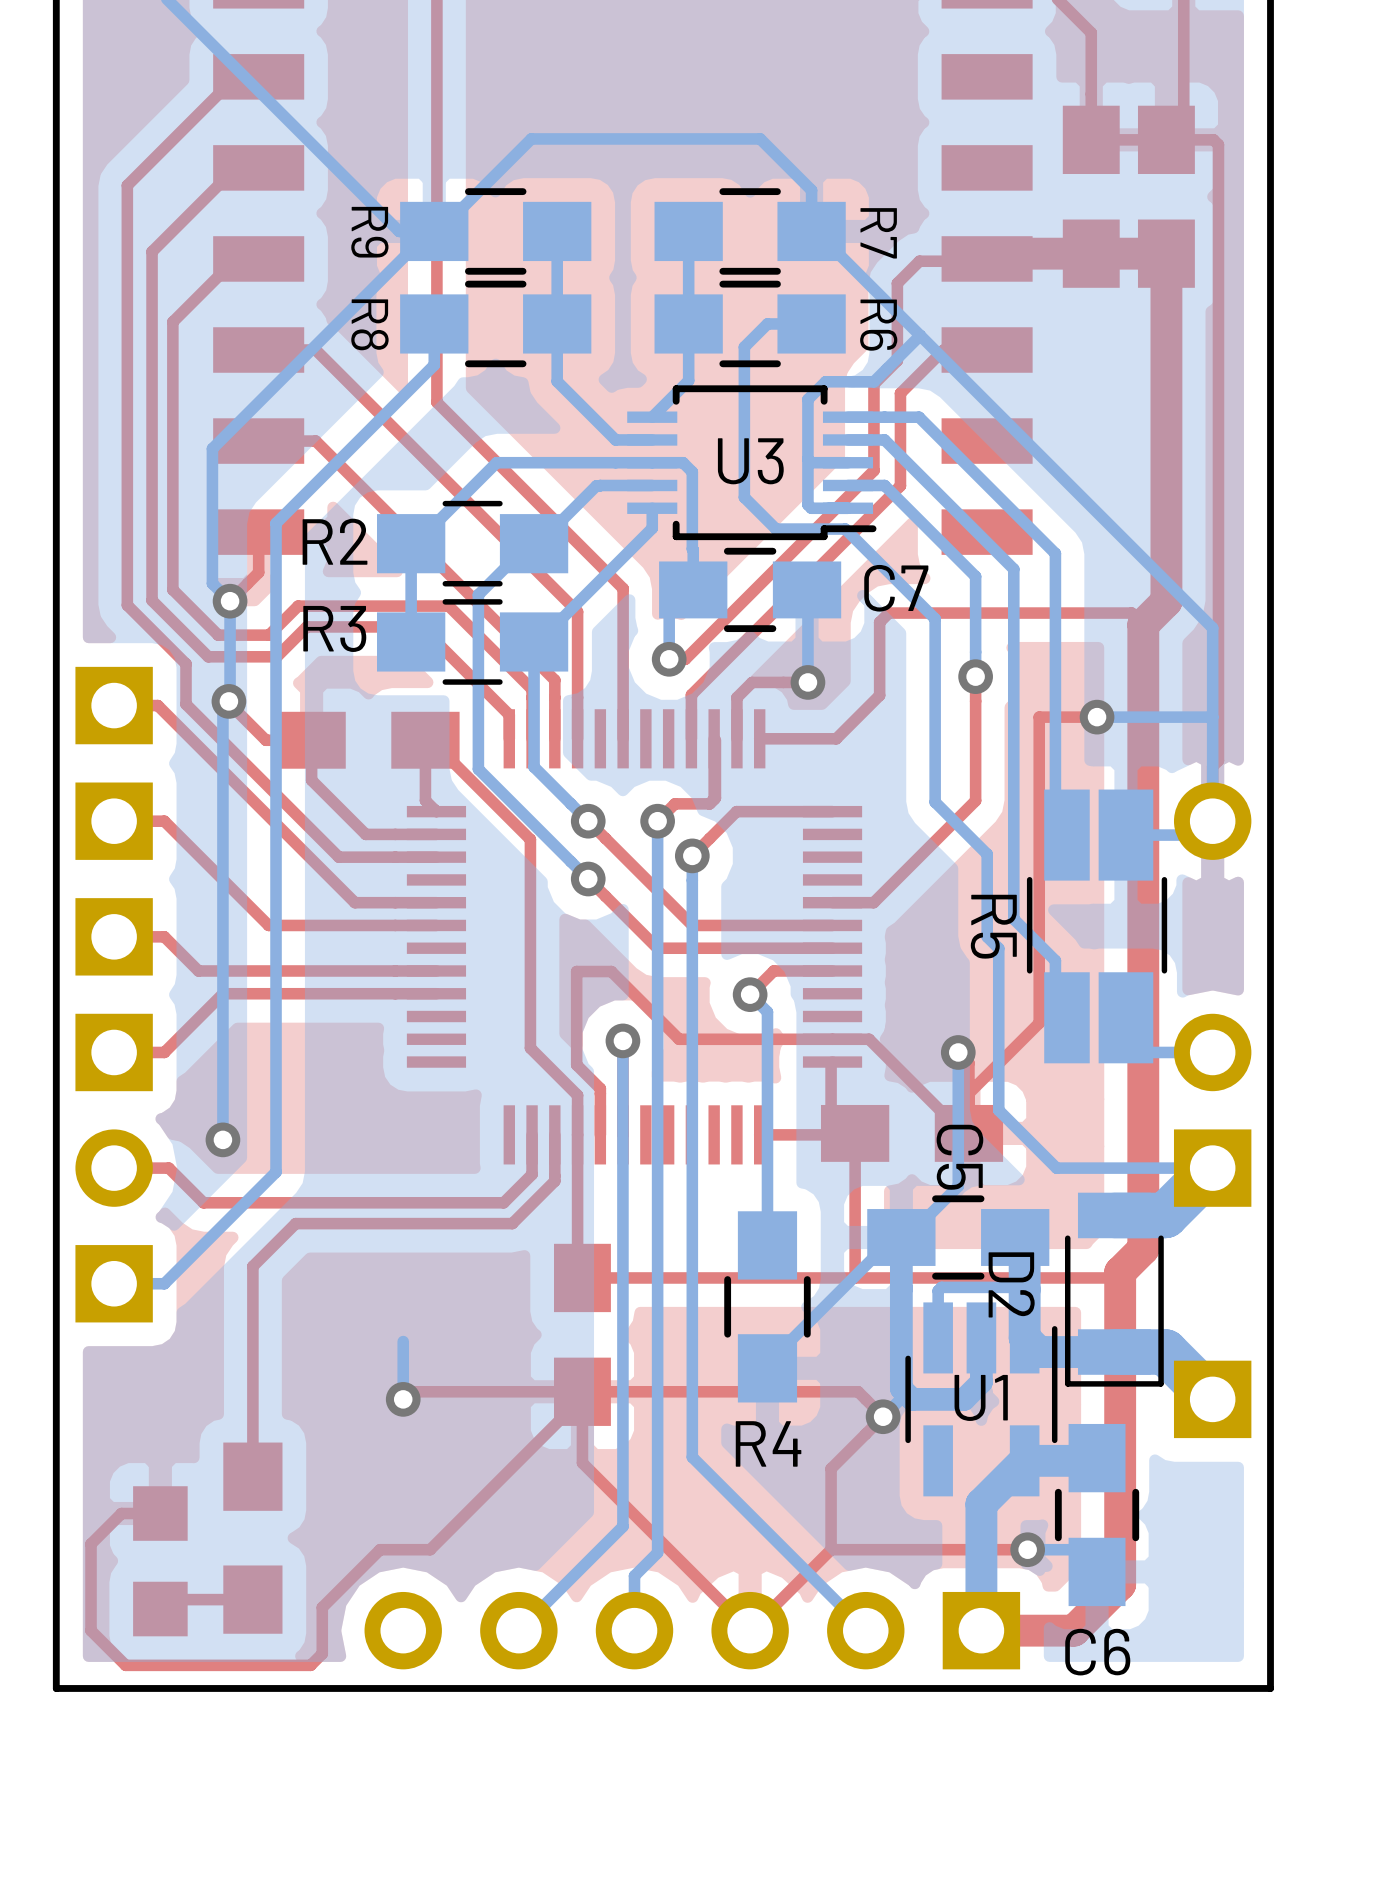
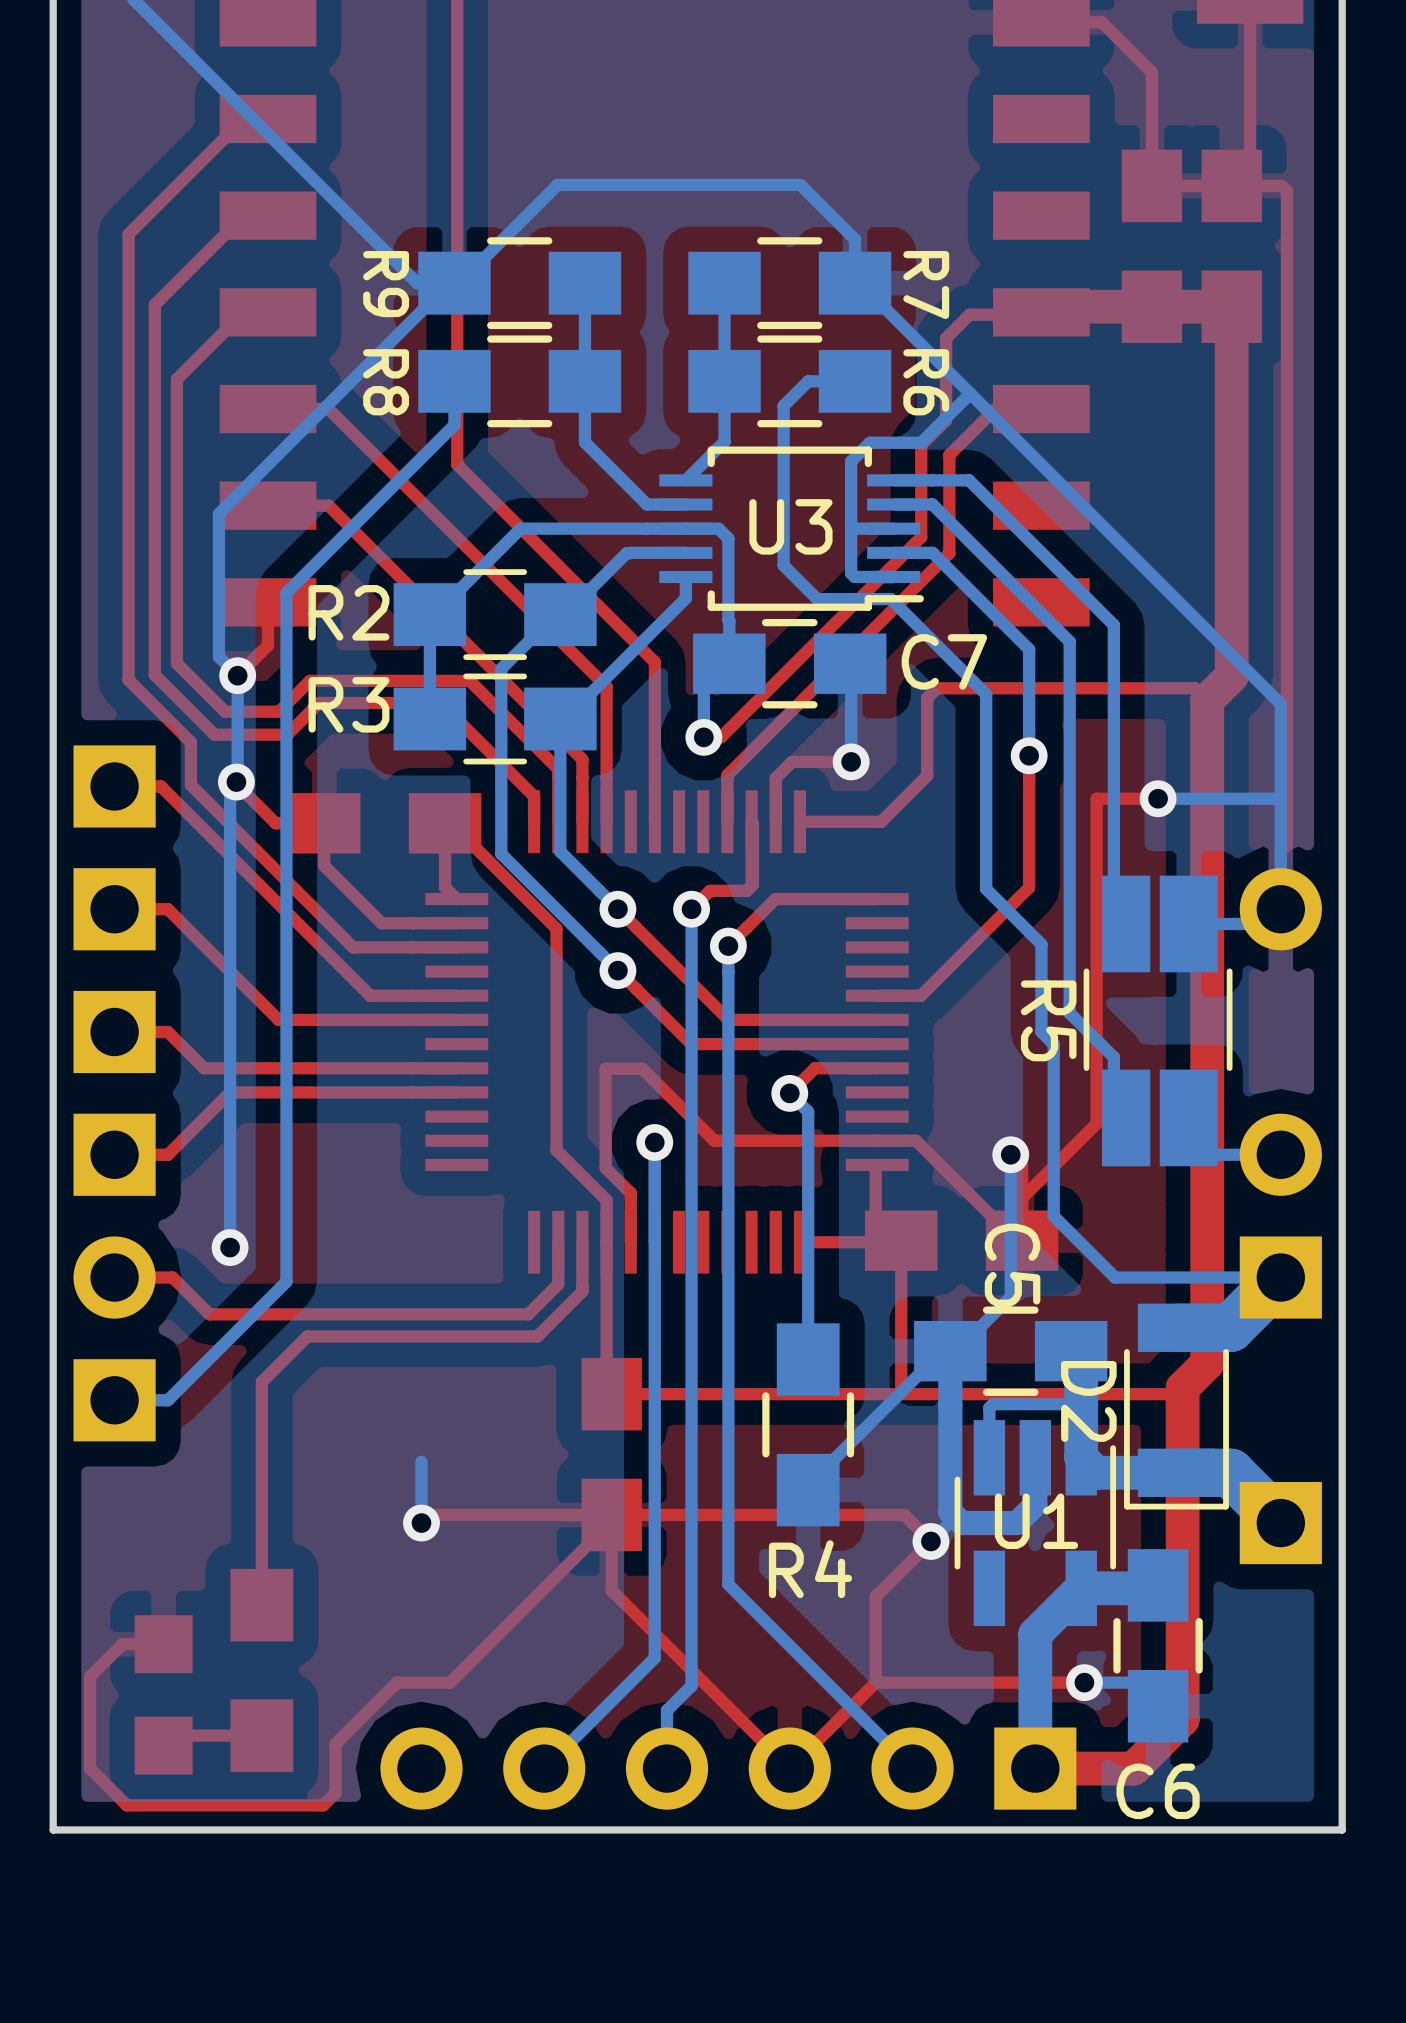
D2 name position: D2 (1011, 1284) -> D2 (1088, 1401)

